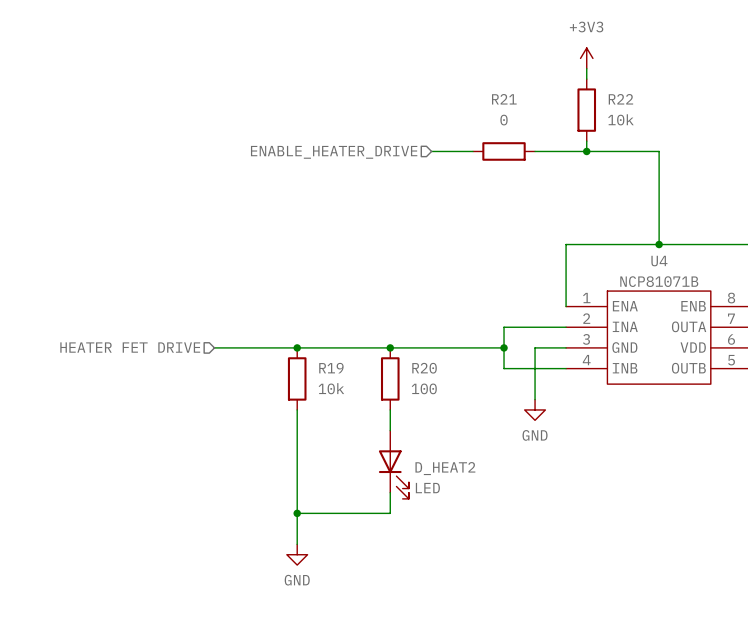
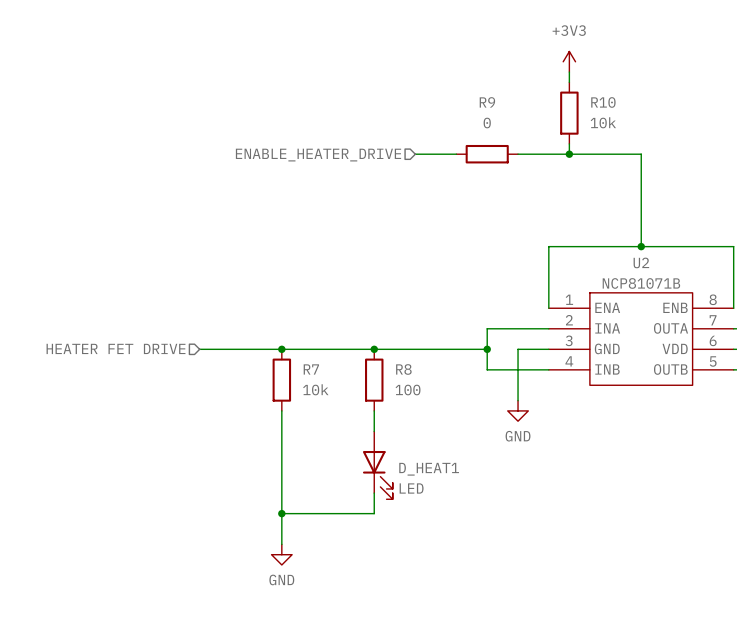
R21 name: R21 (504, 99) -> R9 (487, 102)
R22 name: R22 (620, 99) -> R10 (603, 102)
U4 name: U4 (659, 261) -> U2 (641, 262)
R19 name: R19 (331, 368) -> R7 (311, 369)
R20 name: R20 (424, 368) -> R8 (403, 369)
D_HEAT2 name: D_HEAT2 (445, 468) -> D_HEAT1 (429, 469)

